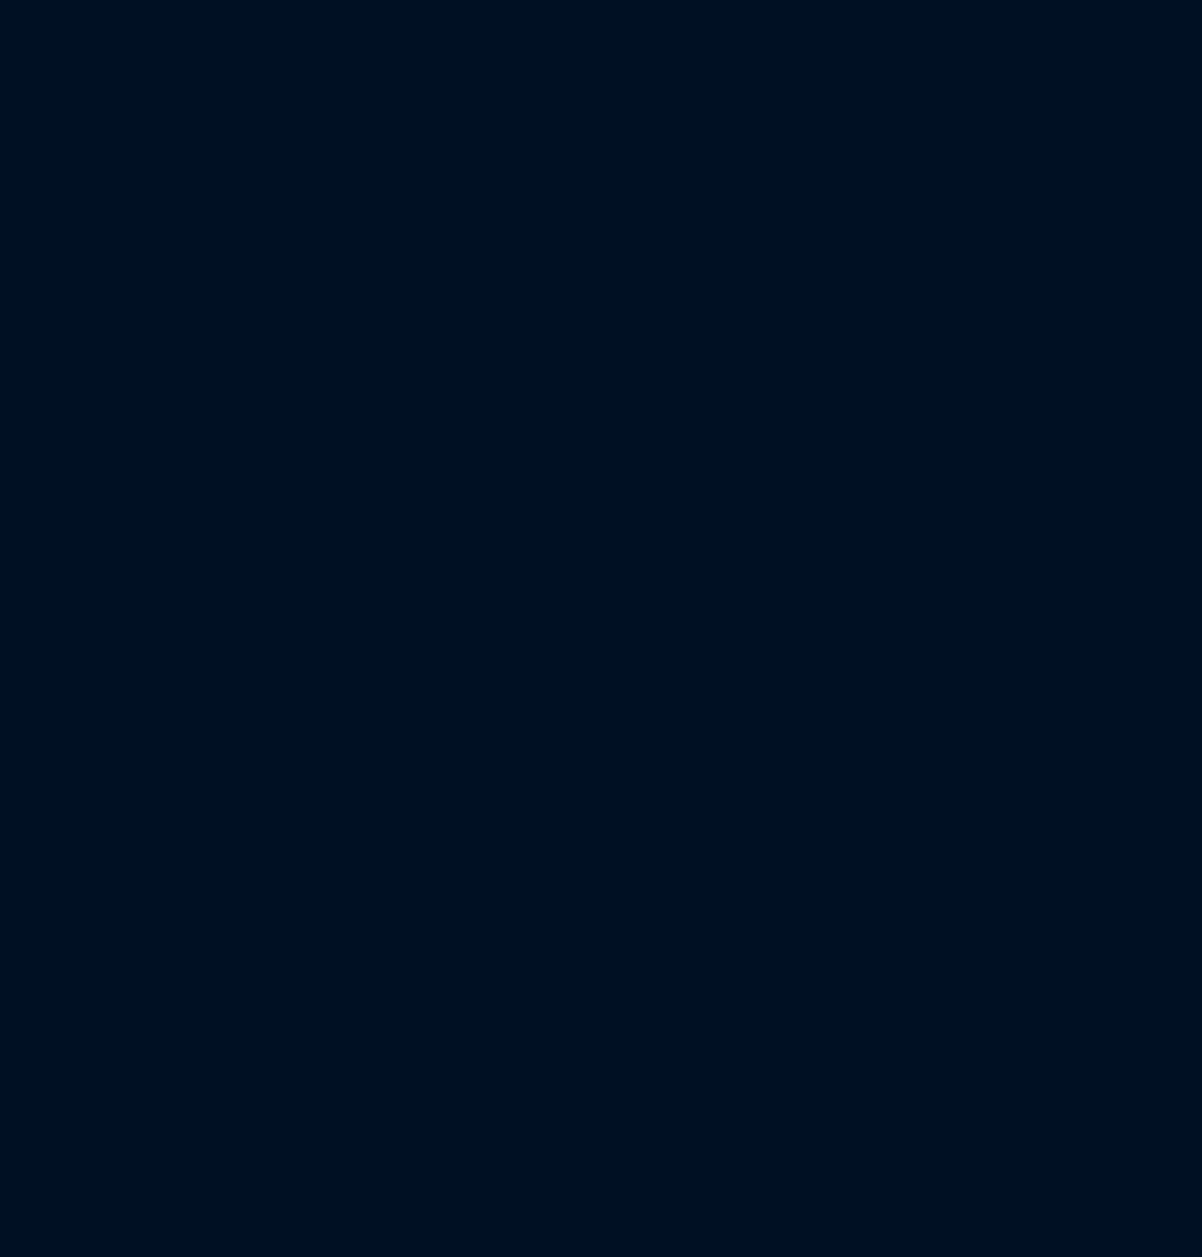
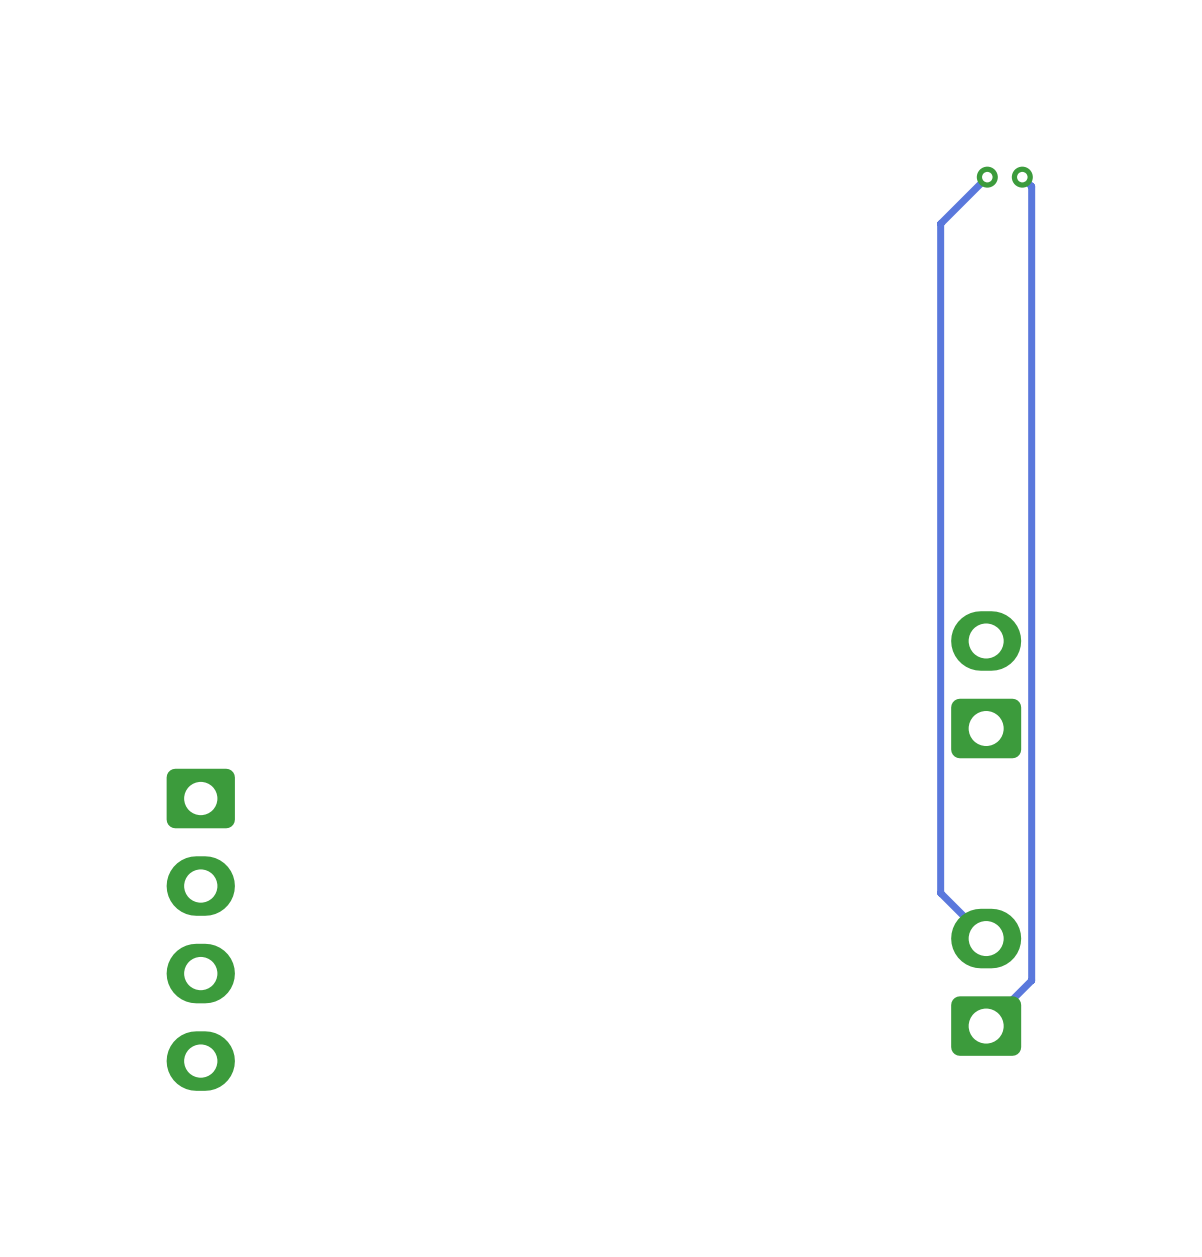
track: none -> (987, 177) (940, 223) (940, 893) (986, 938)
via: none -> (987, 177)
track: none -> (1022, 177) (1031, 186) (1031, 980) (986, 1026)
via: none -> (1022, 177)
part: none -> (986, 684)
part: none -> (200, 929)
part: none -> (986, 982)

